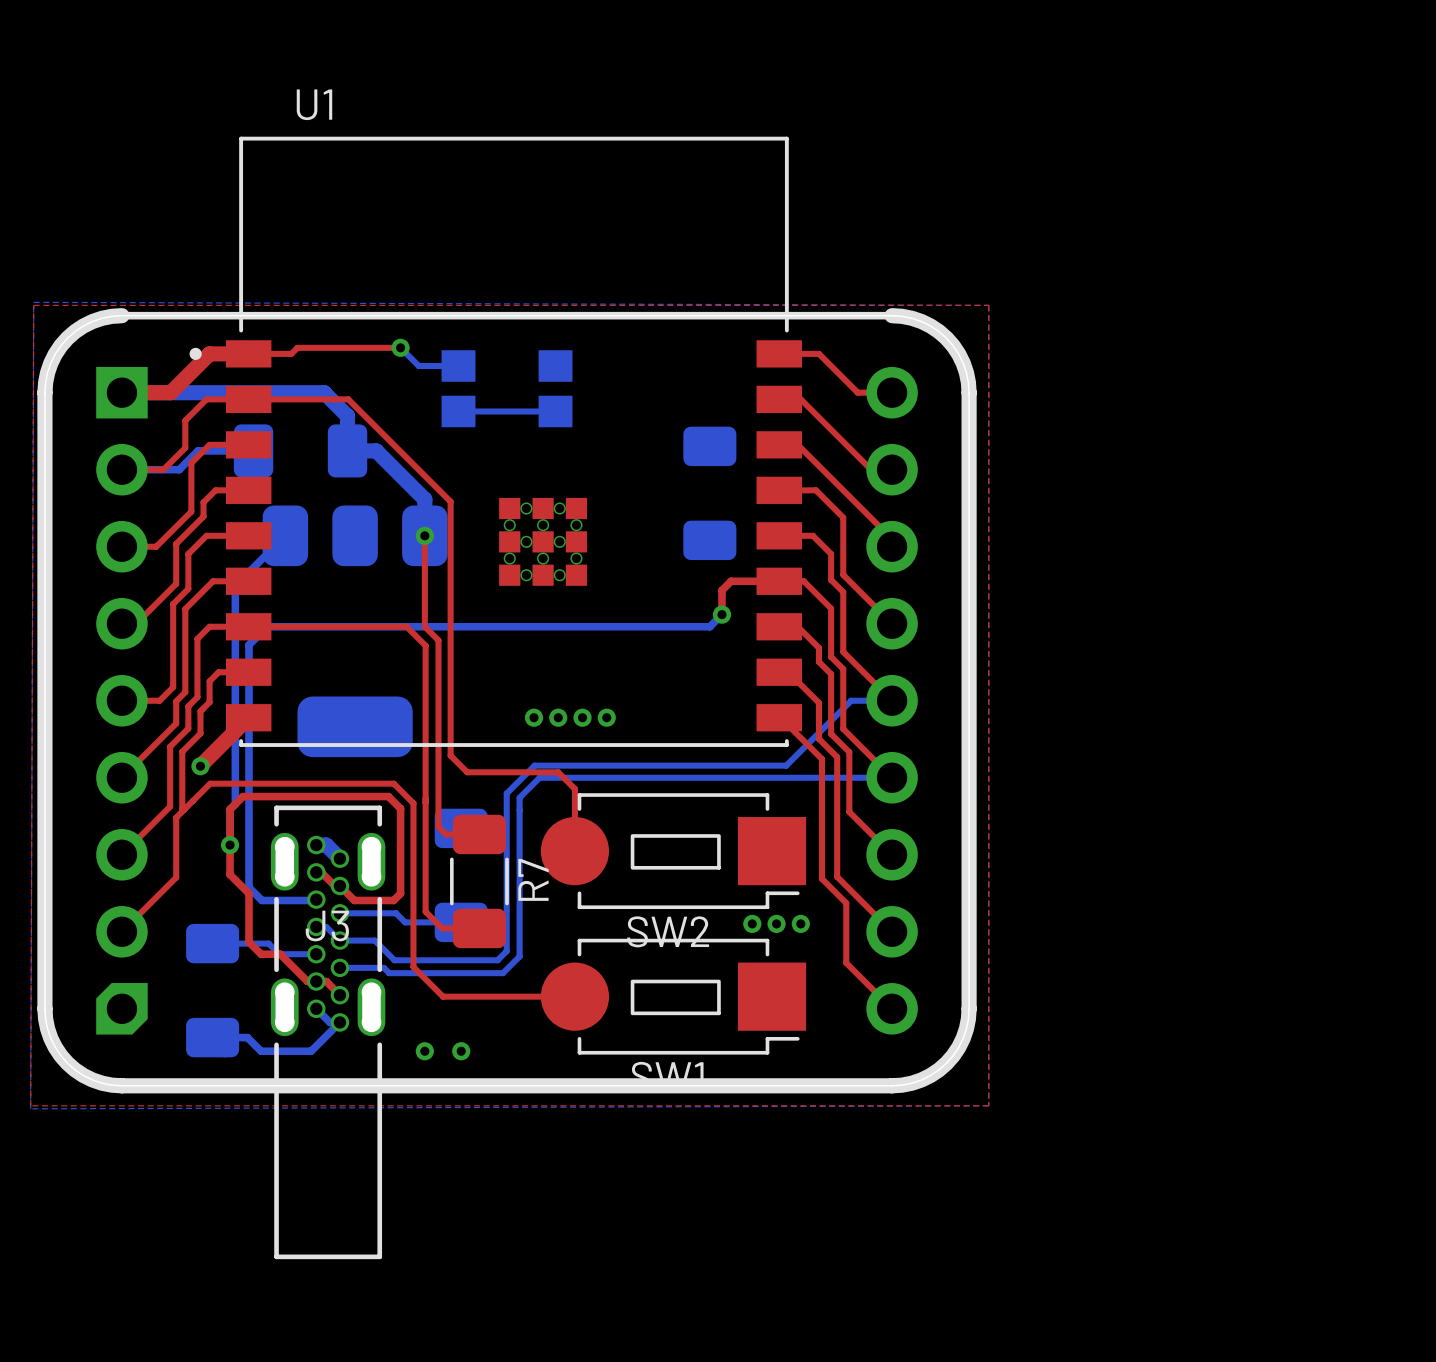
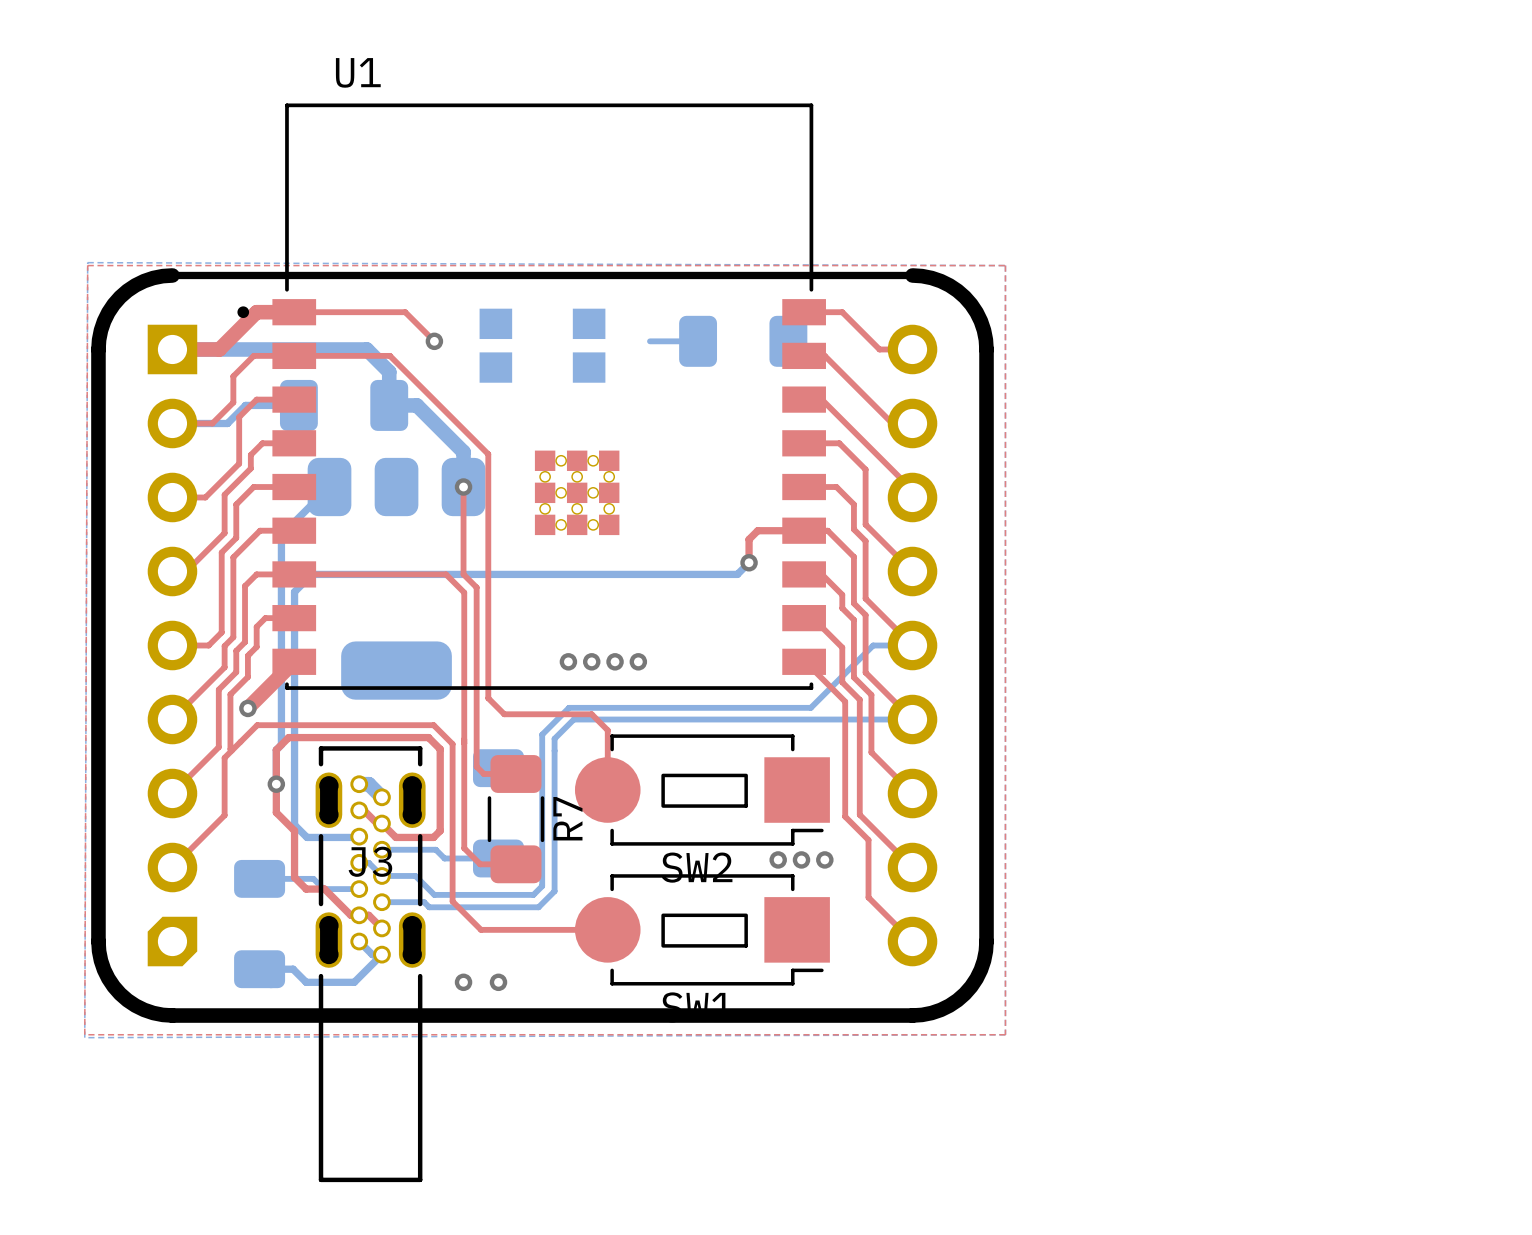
top track: (400, 347) (297, 347) (291, 353) -> (434, 341) (405, 312) (335, 312)
bottom track: (400, 347) (418, 366) (458, 366) -> none
via position: (400, 347) -> (434, 341)
bottom track: none -> (650, 341) (698, 341)
bottom track: (458, 411) (555, 411) -> none
part rotation: 0° (709, 493) -> 90° clockwise (743, 341)
part position: (709, 493) -> (743, 341)

